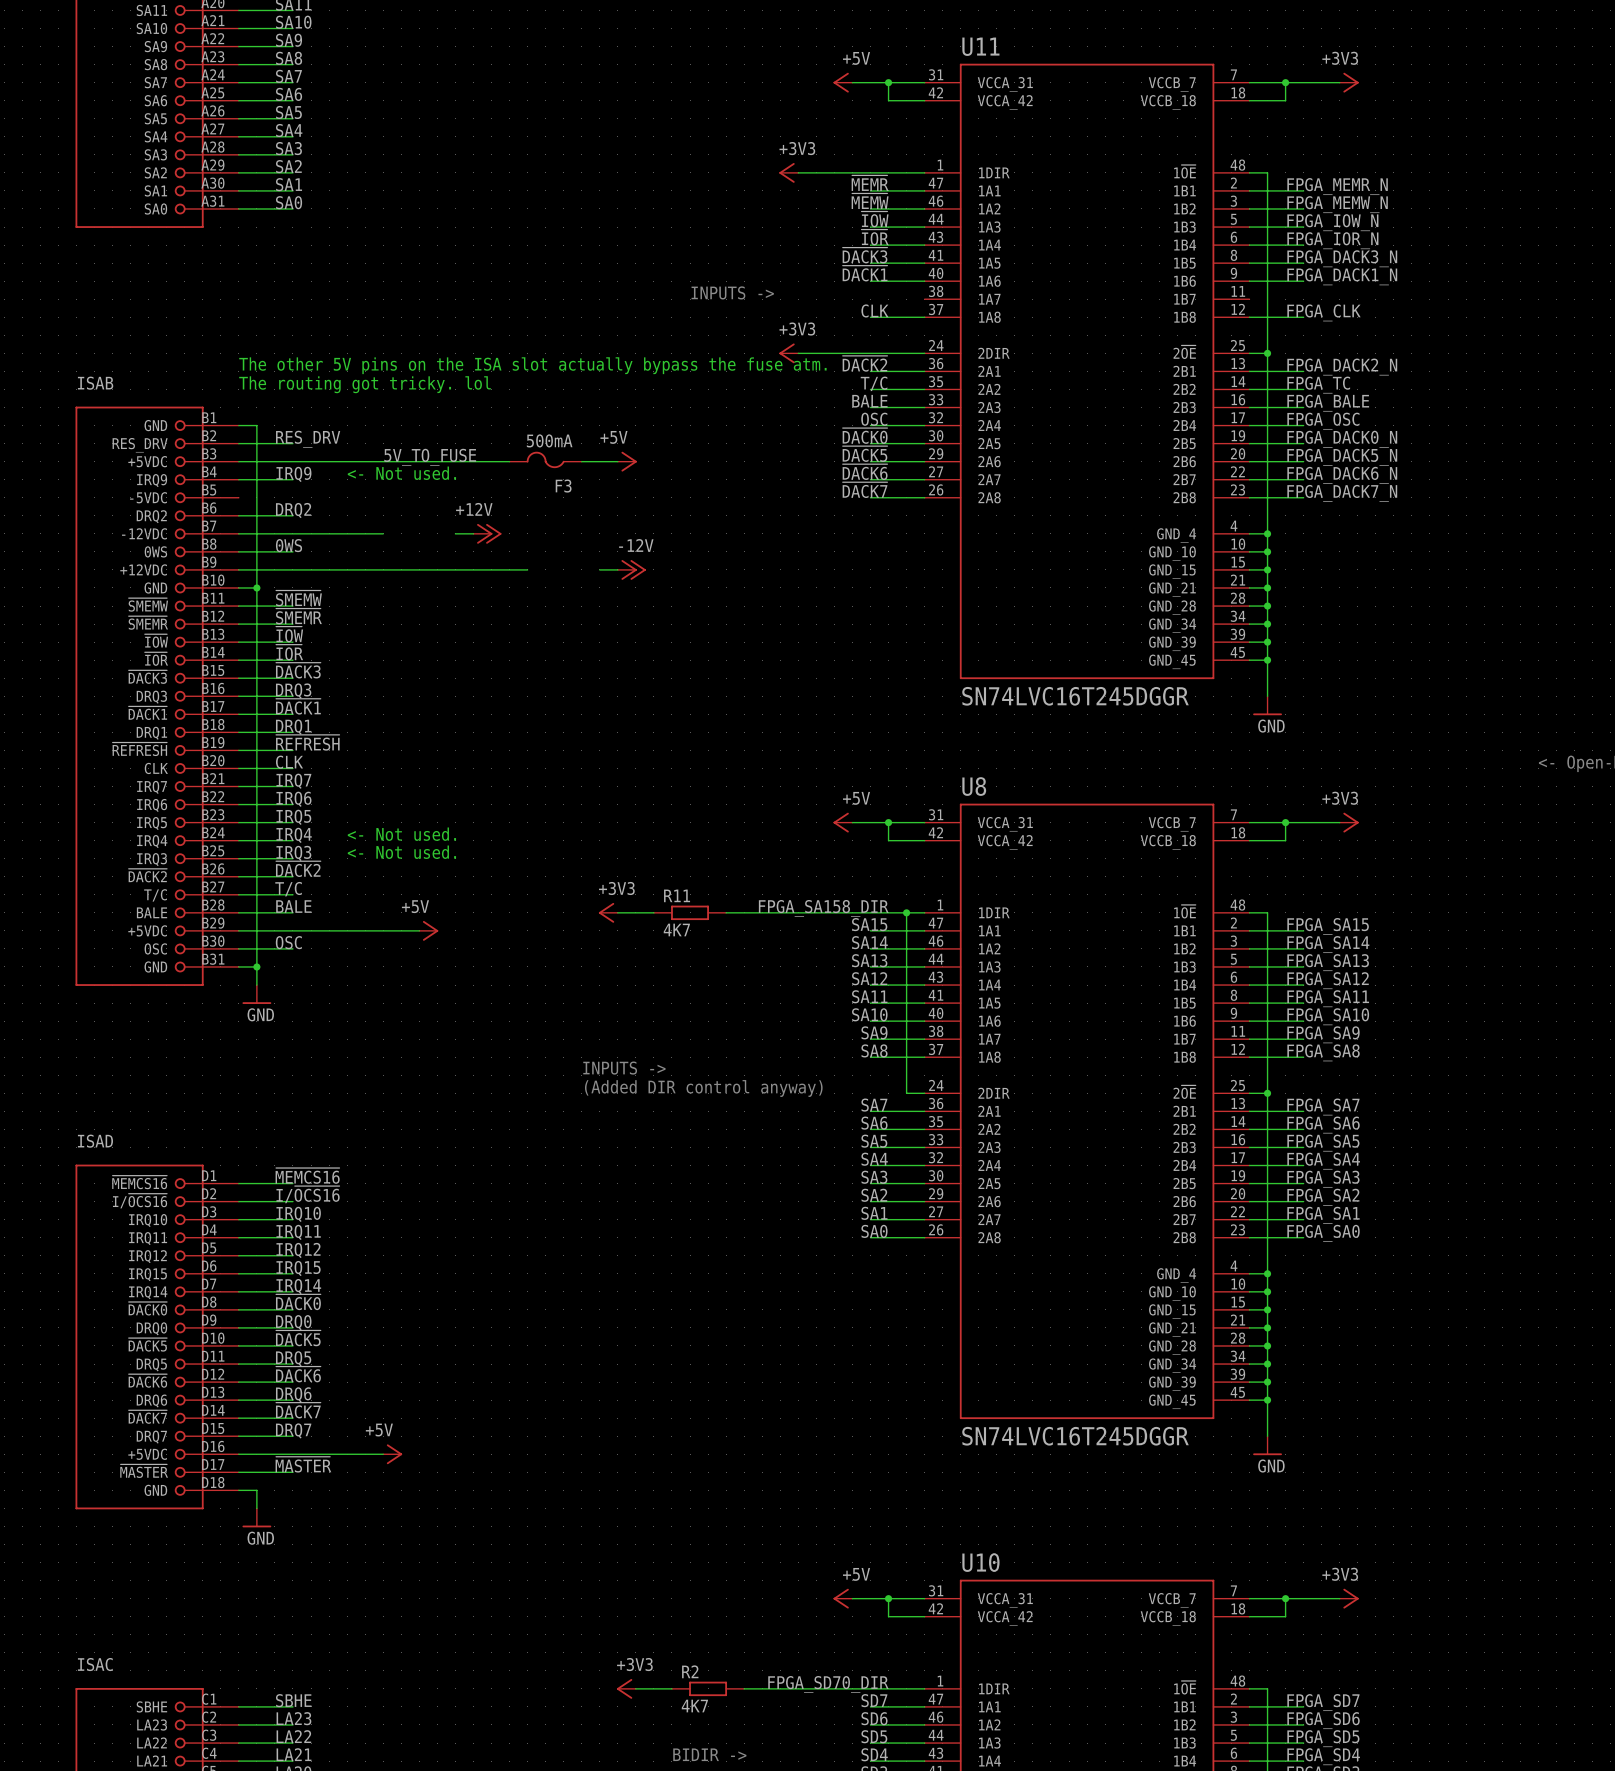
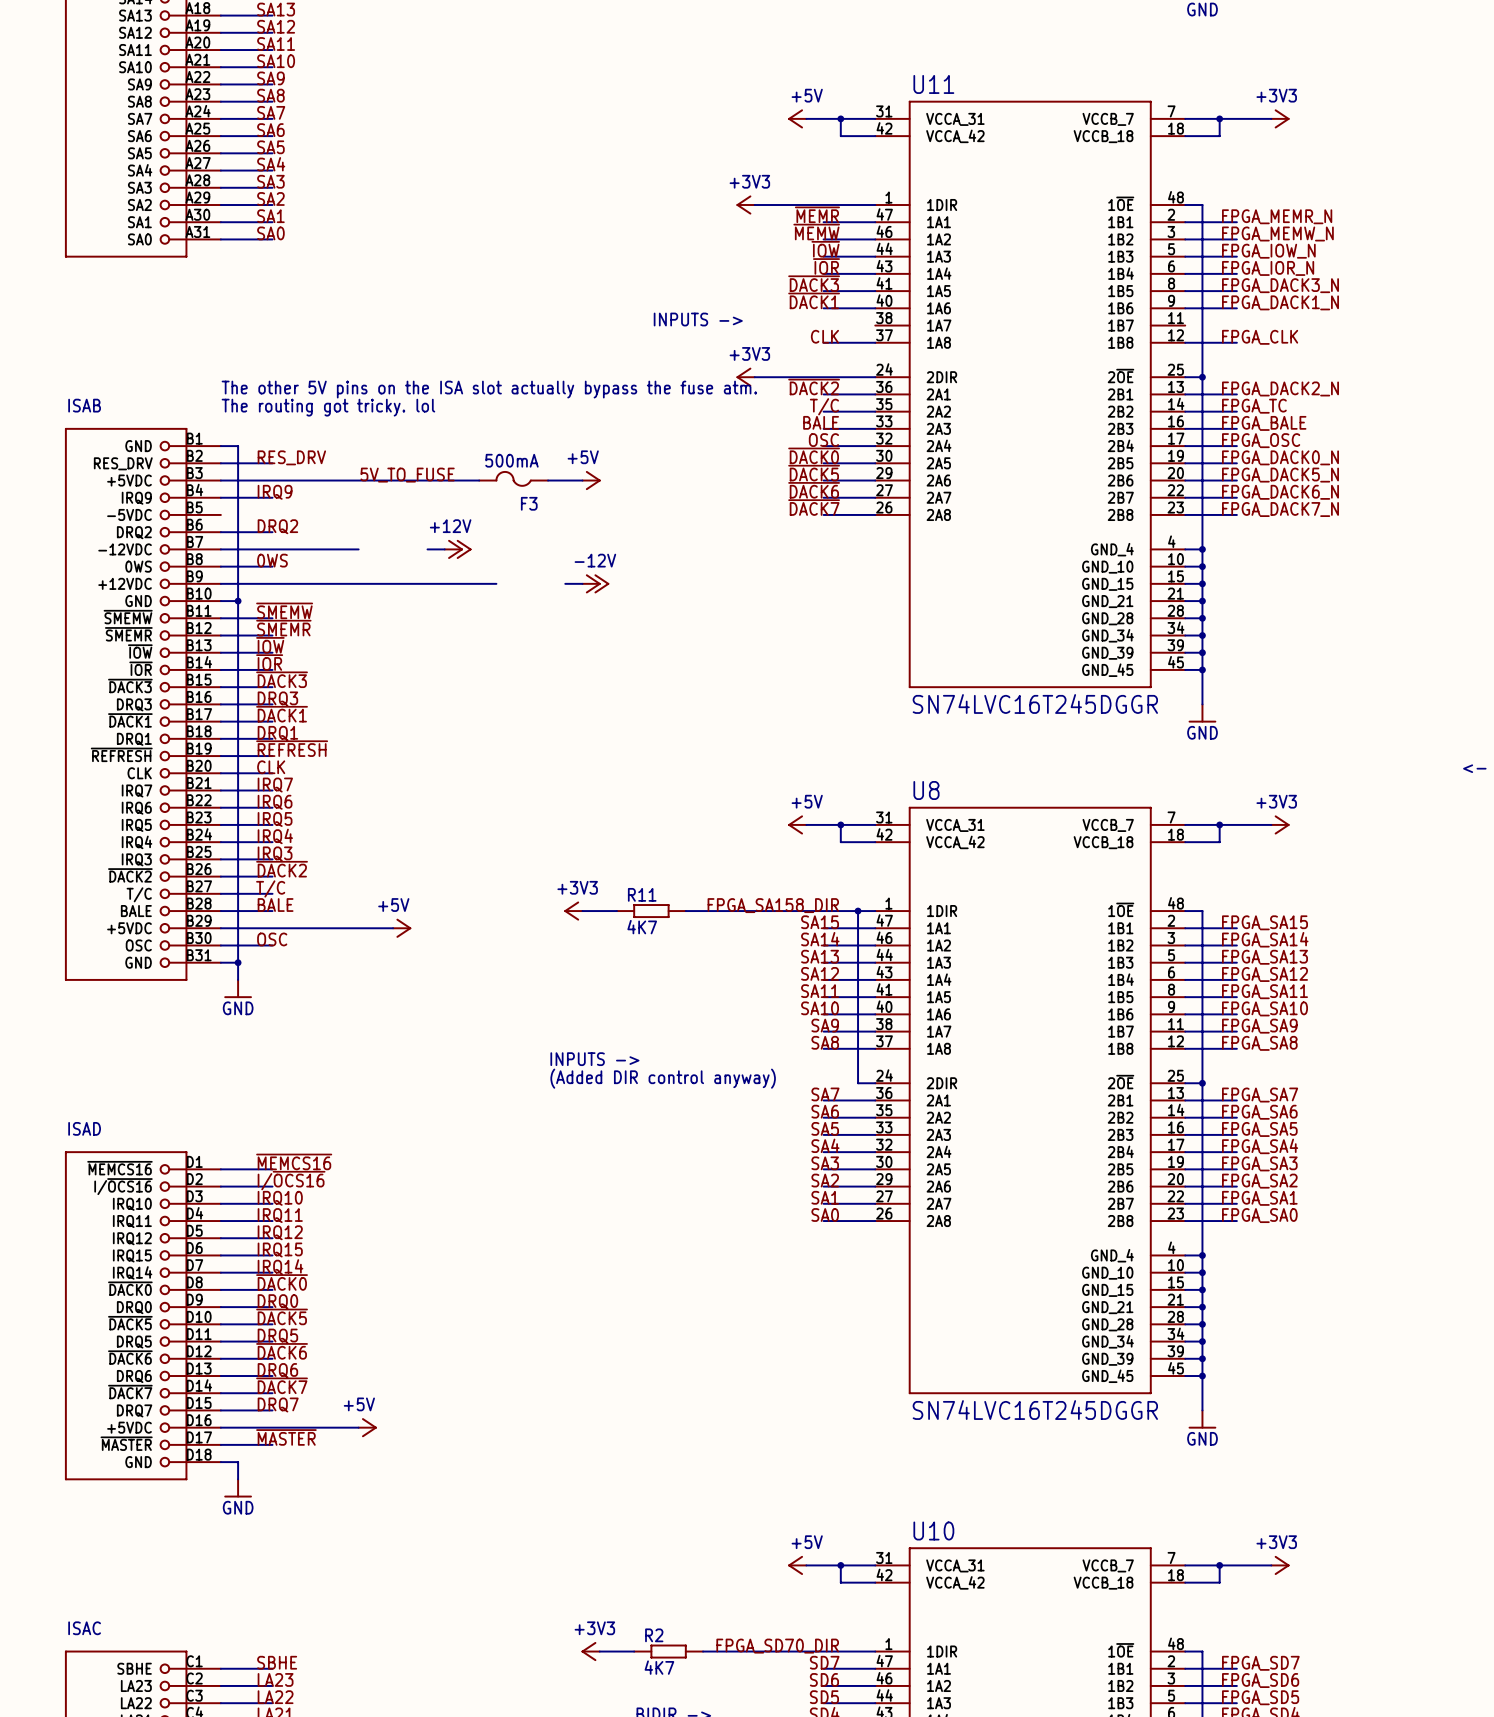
text: <- Not used. (401, 473) -> none
text: <- Not used. (401, 834) -> none
text: <- Not used. (401, 852) -> none

